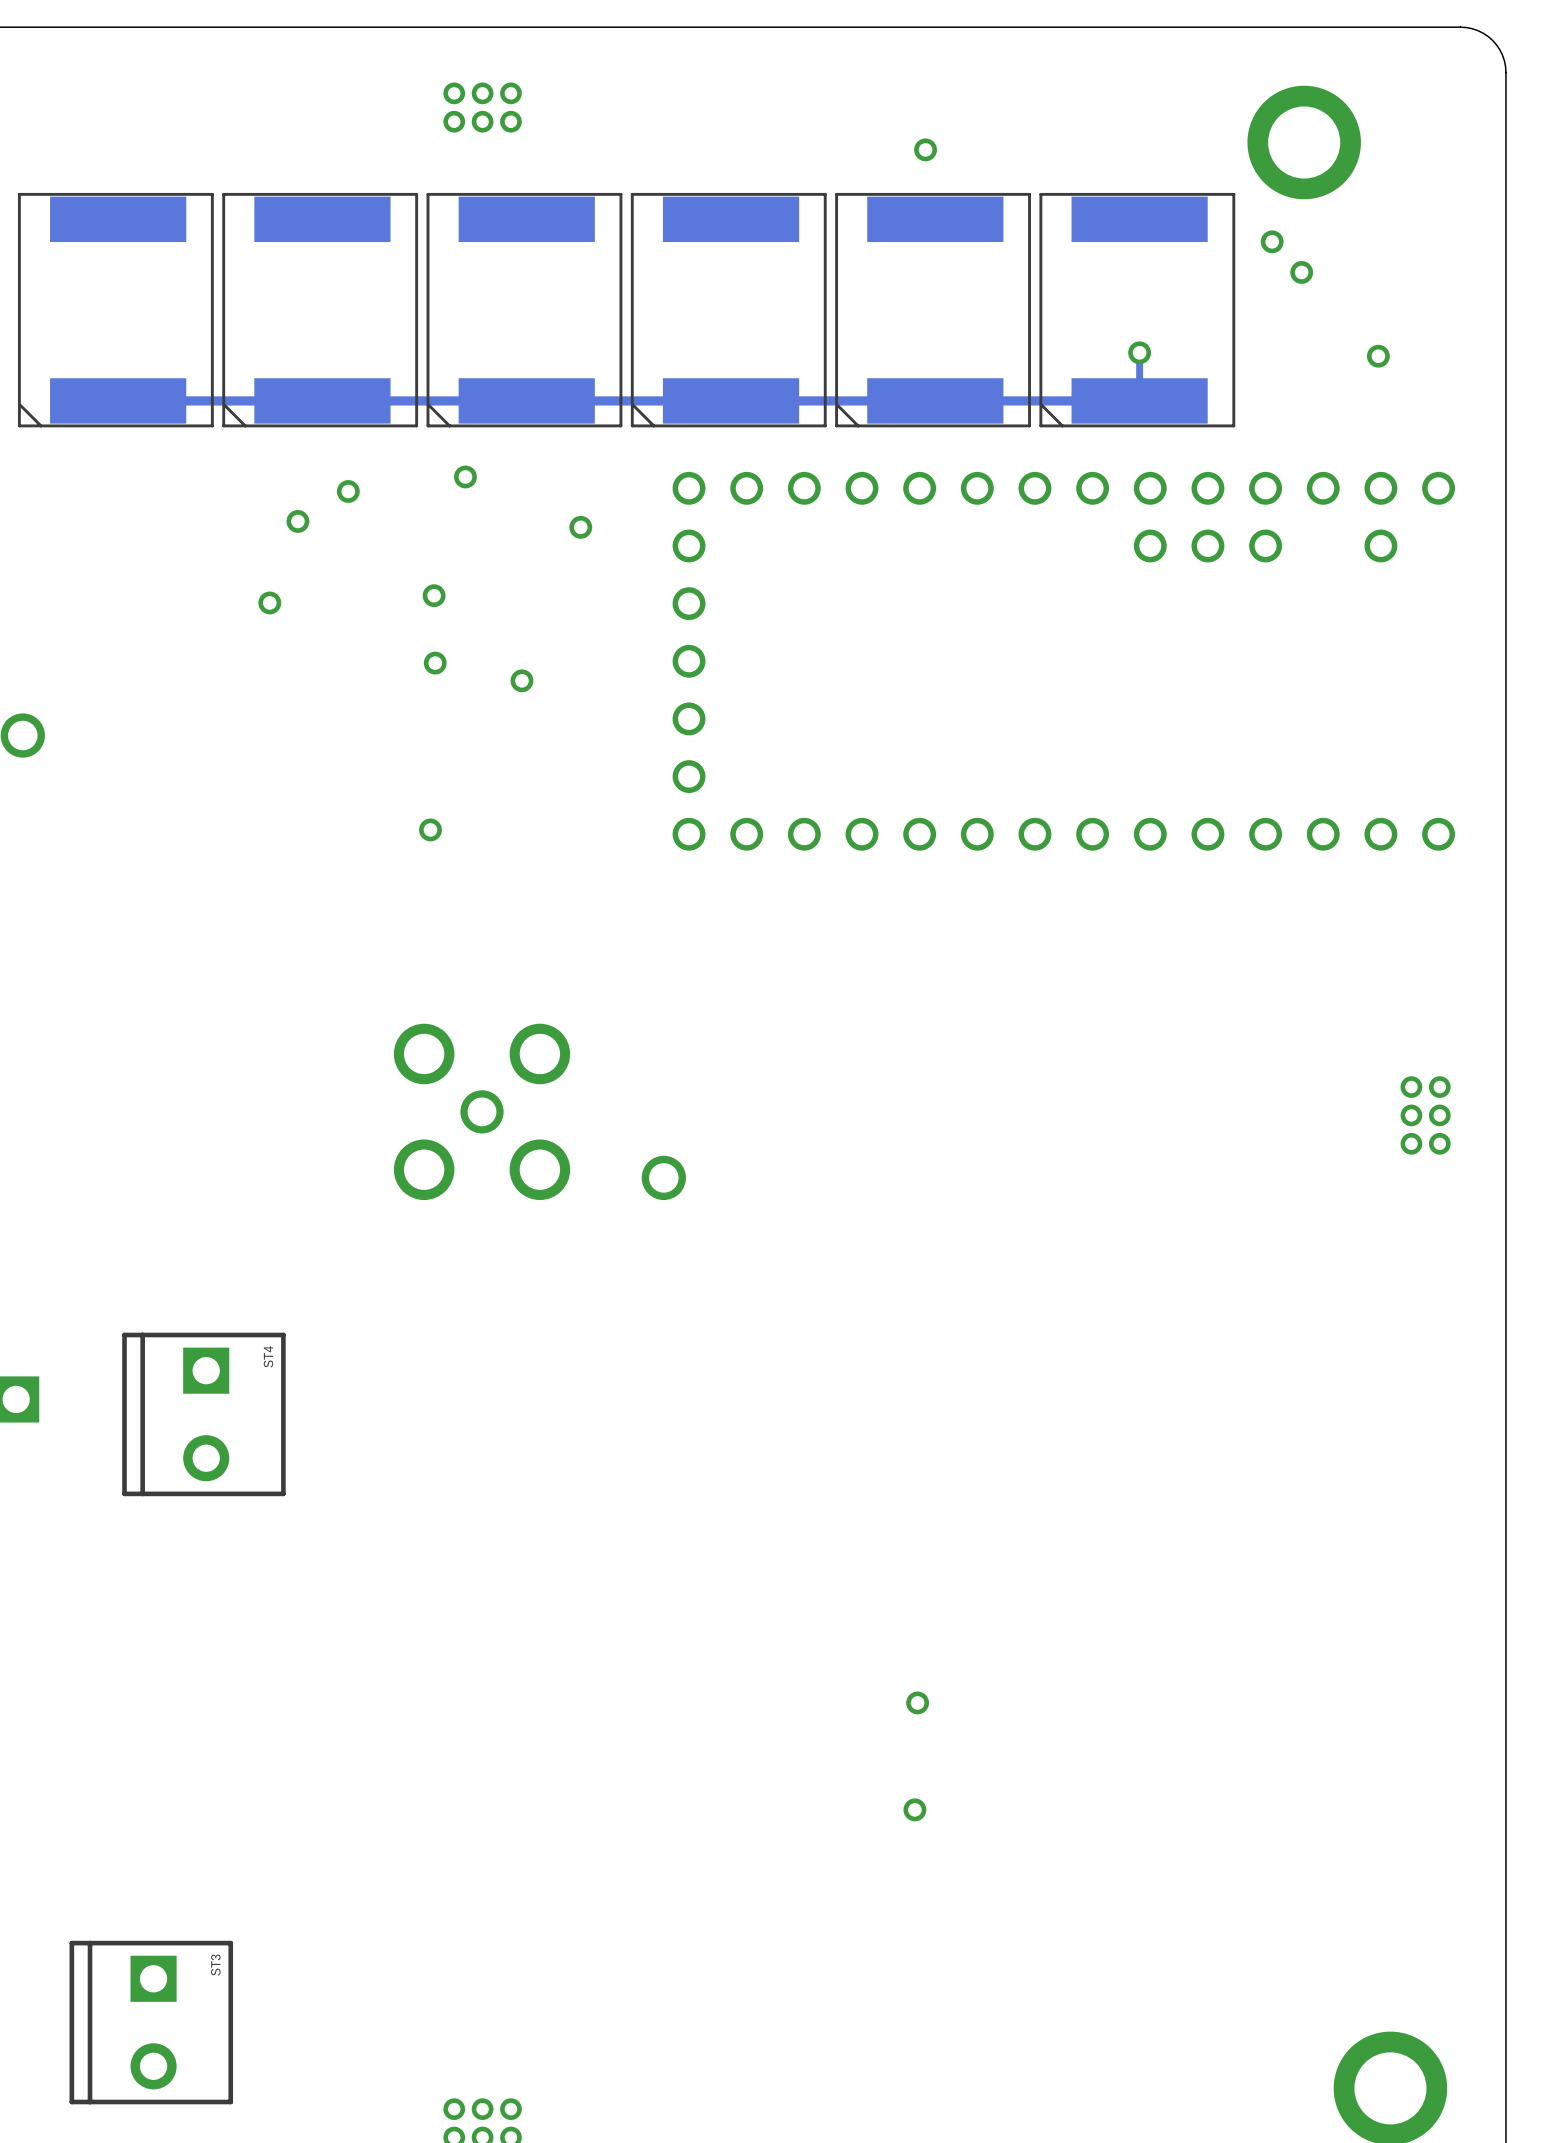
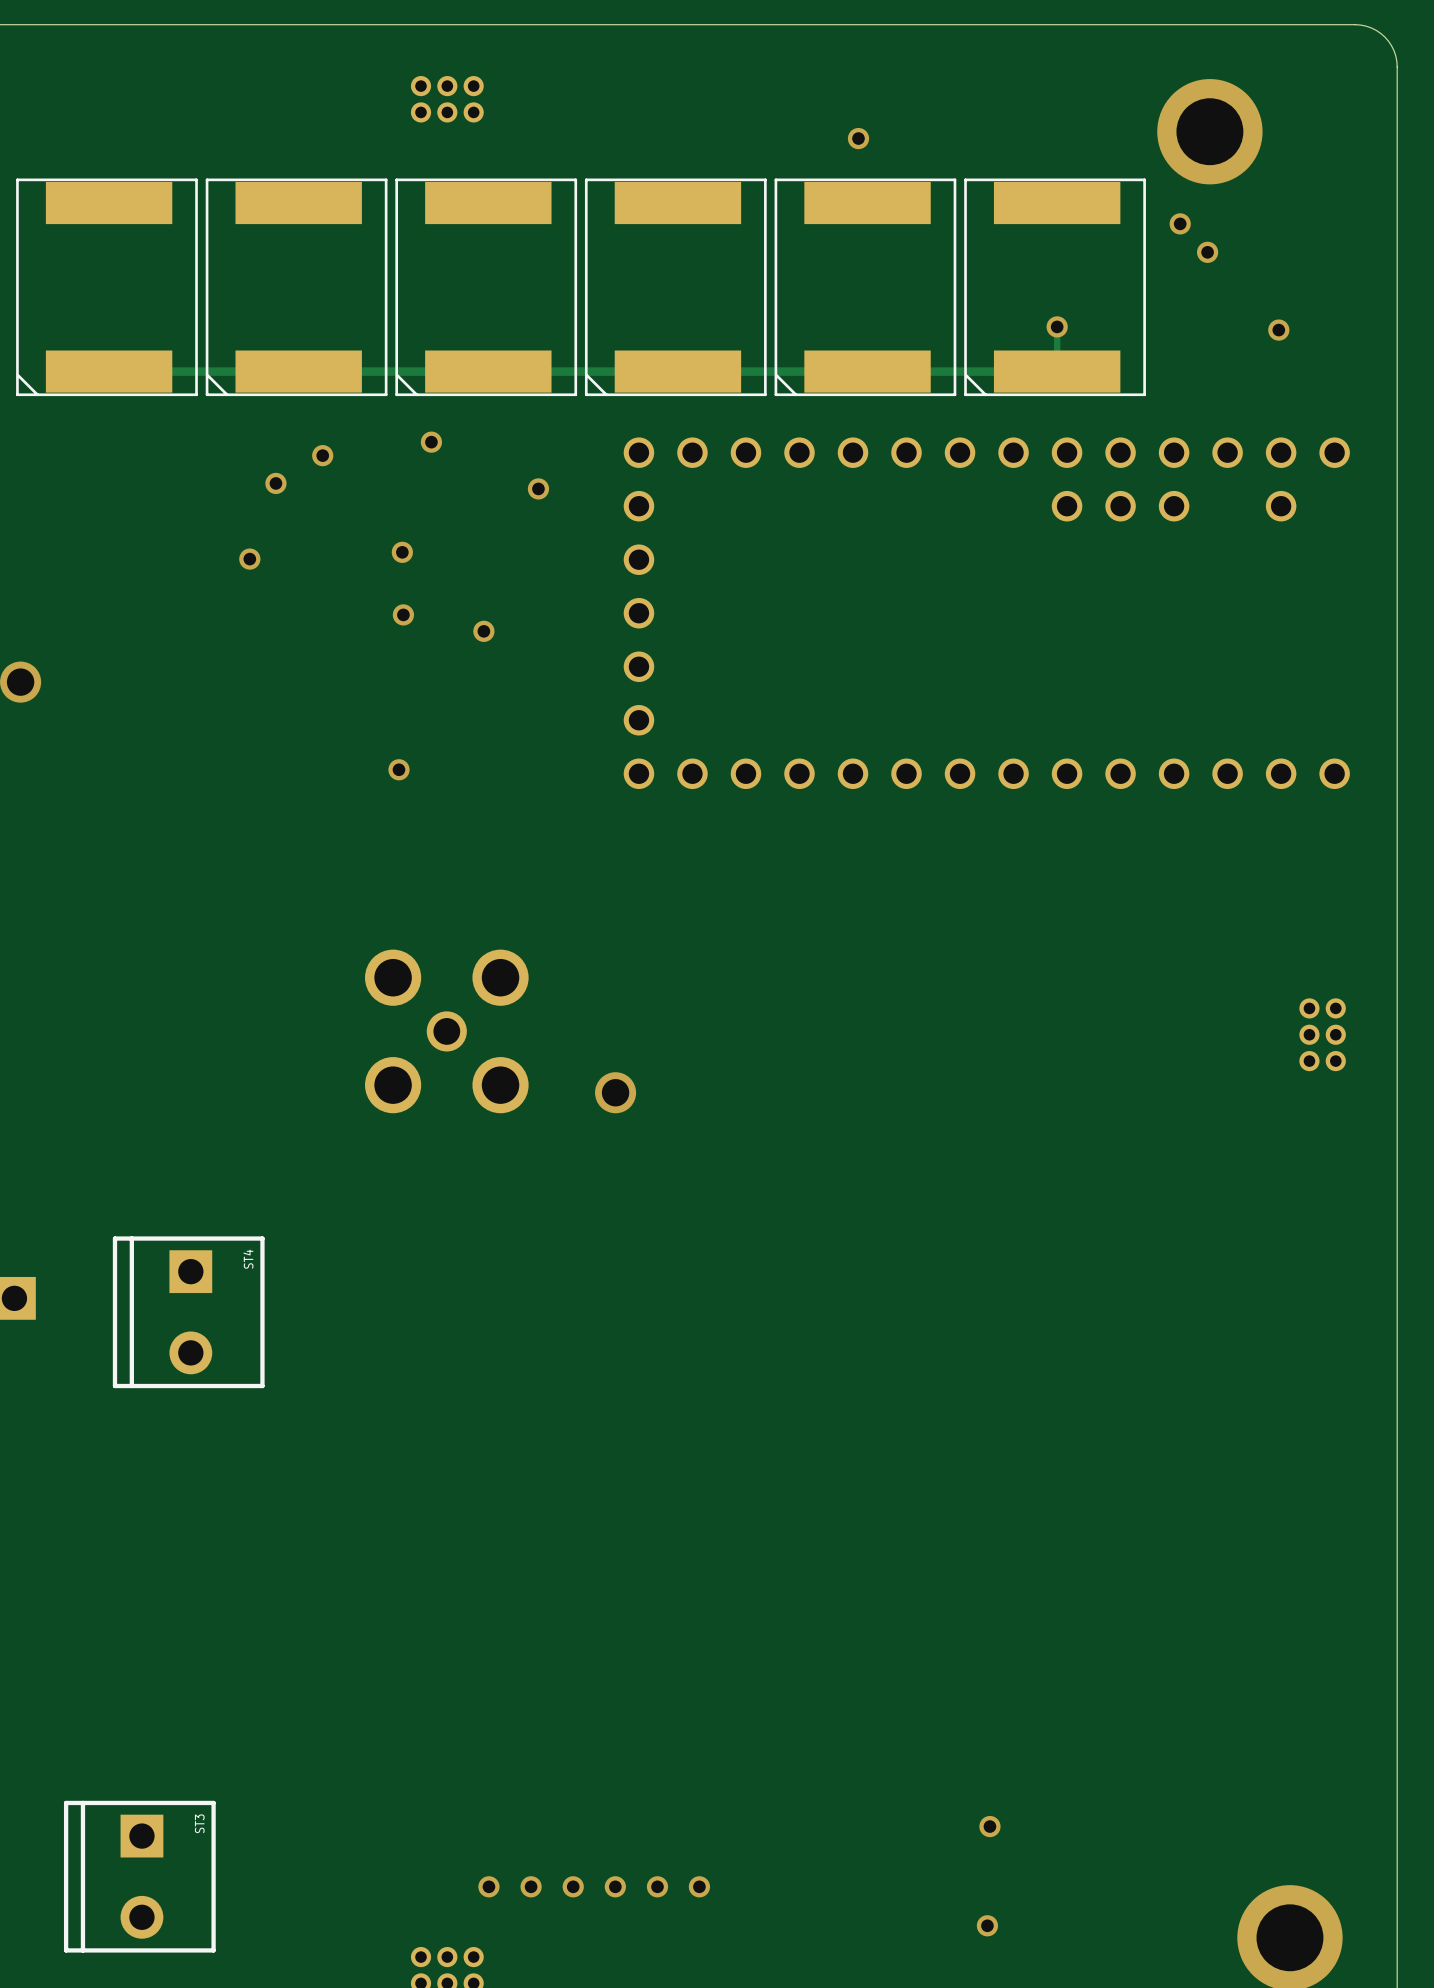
via: (917, 1702) -> none
via: (914, 1809) -> none
via: none -> (989, 1826)
via: none -> (488, 1886)
via: none -> (531, 1886)
via: none -> (573, 1886)
via: none -> (615, 1886)
via: none -> (657, 1886)
via: none -> (699, 1886)
via: none -> (987, 1925)

